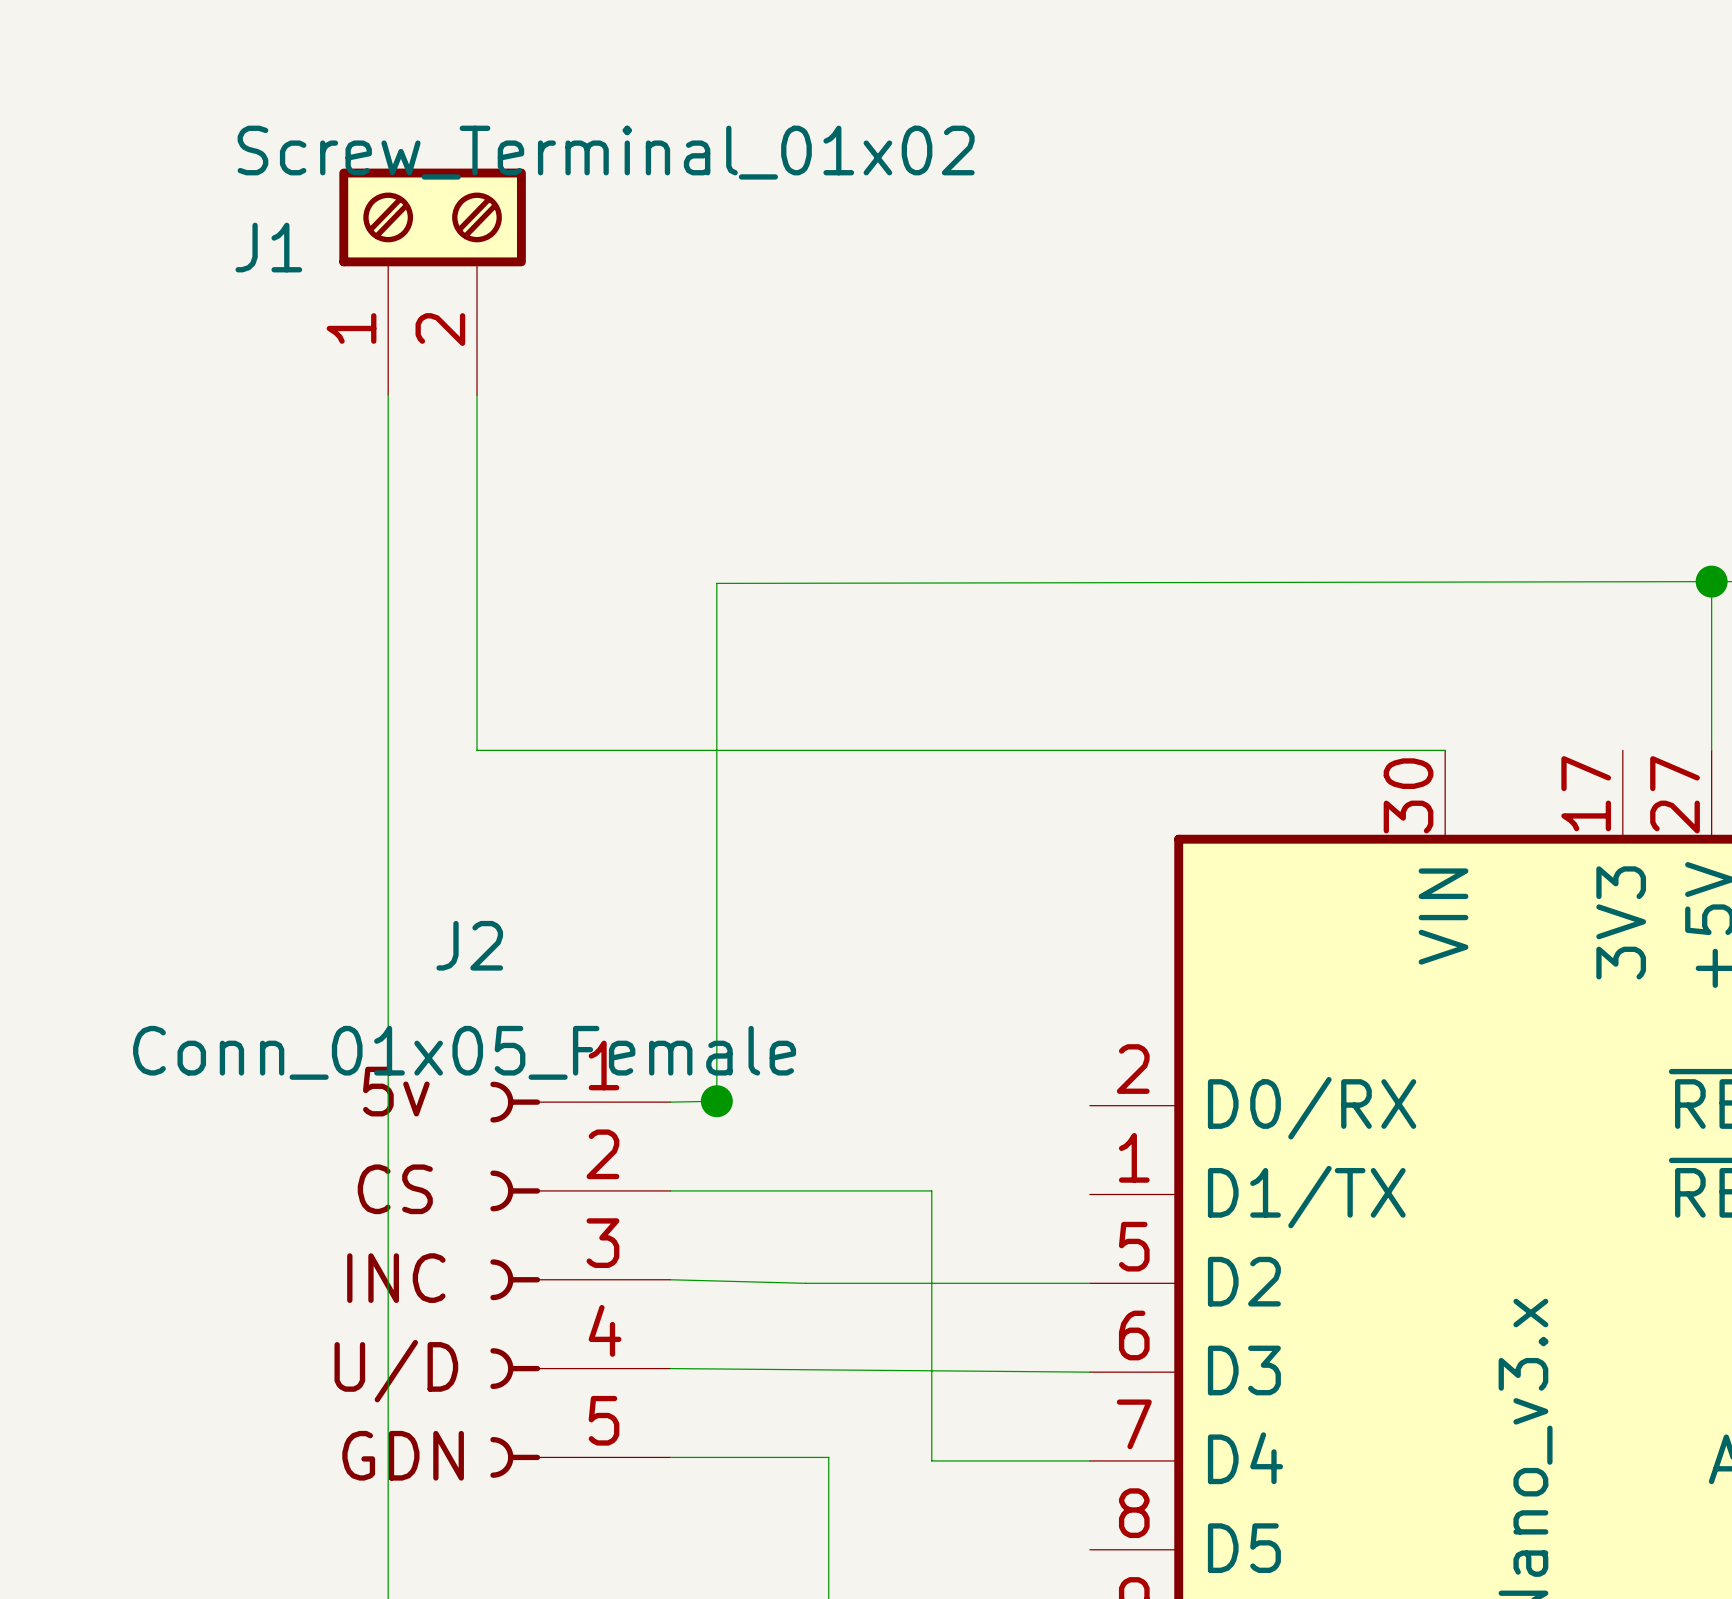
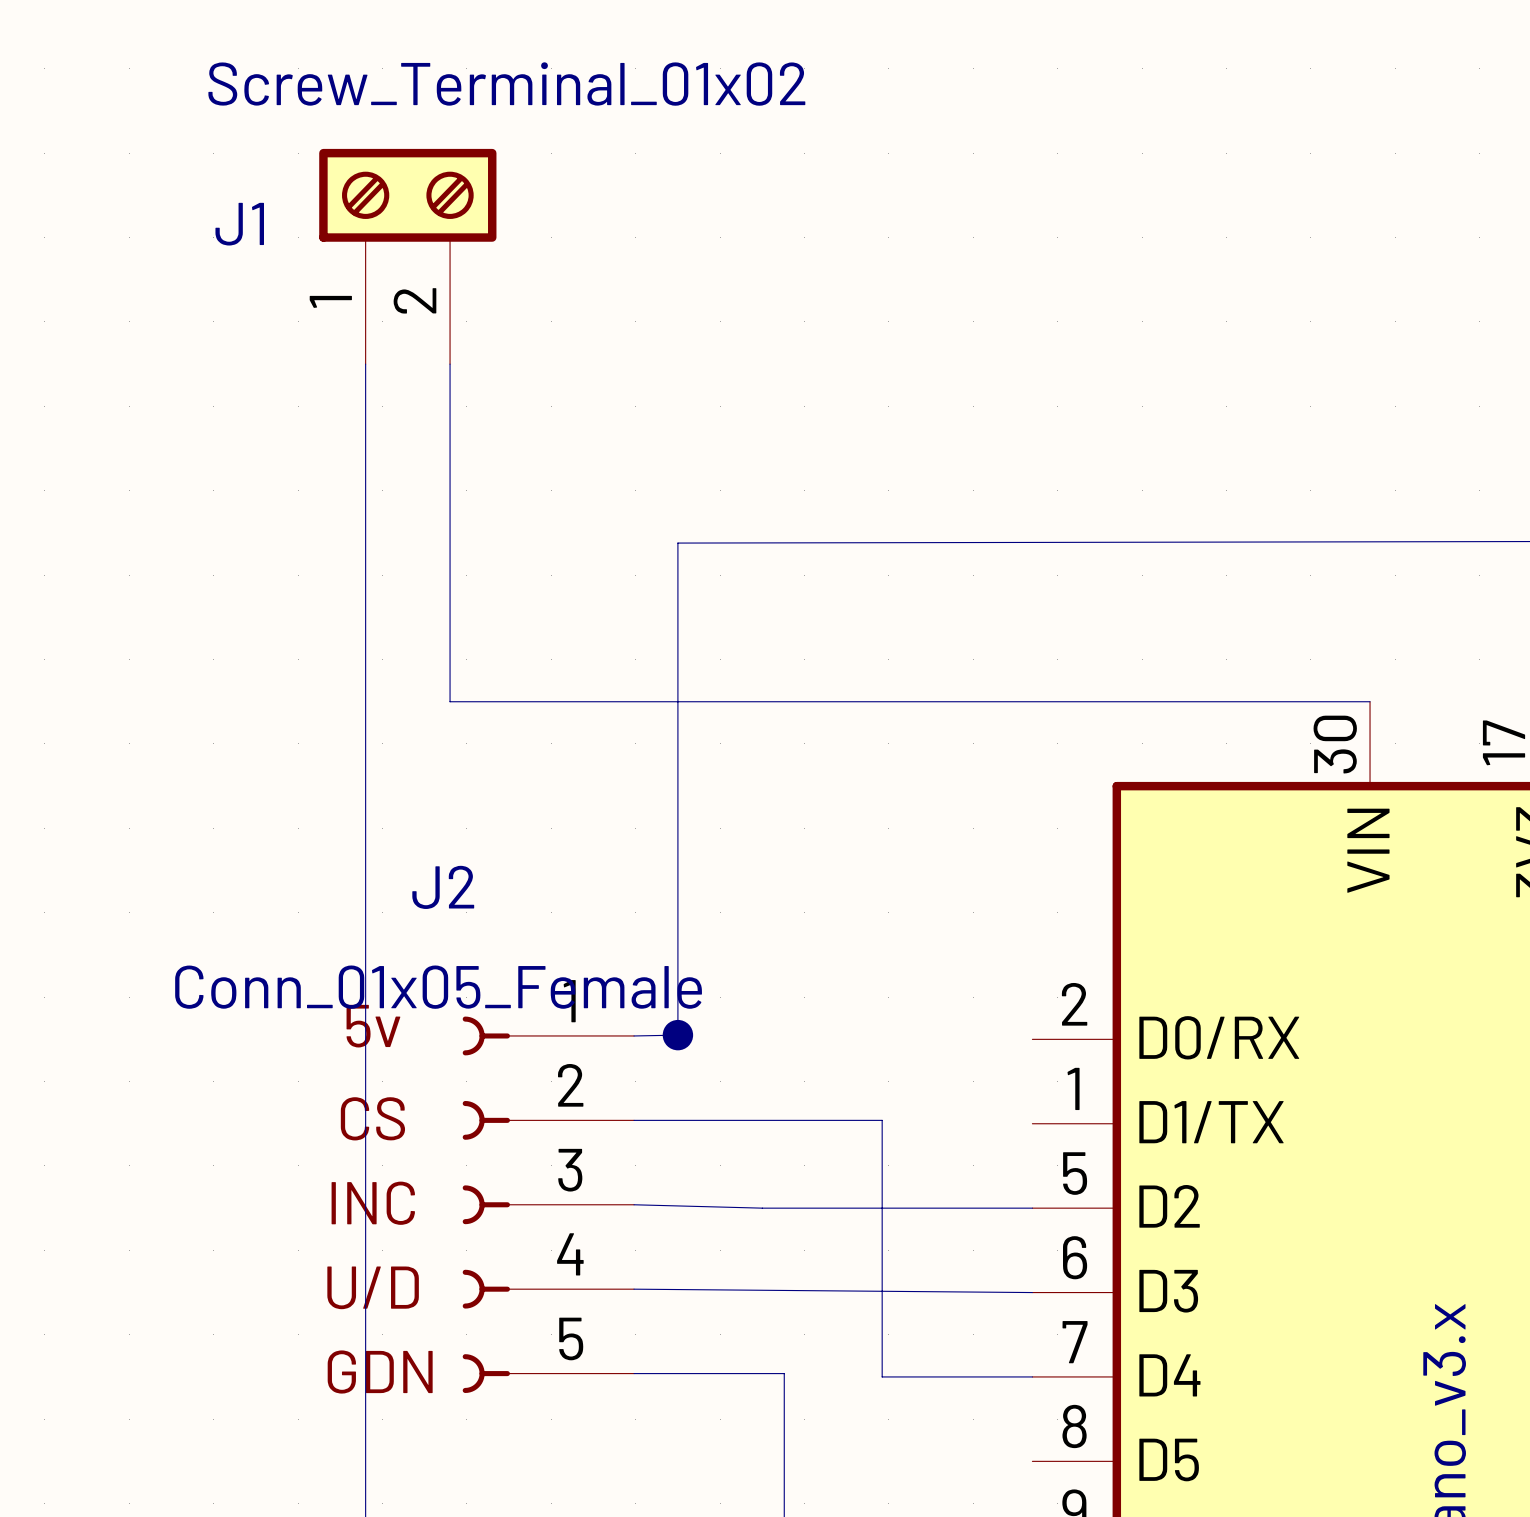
J1 value position: Screw_Terminal_01x02 (606, 152) -> Screw_Terminal_01x02 (506, 84)

